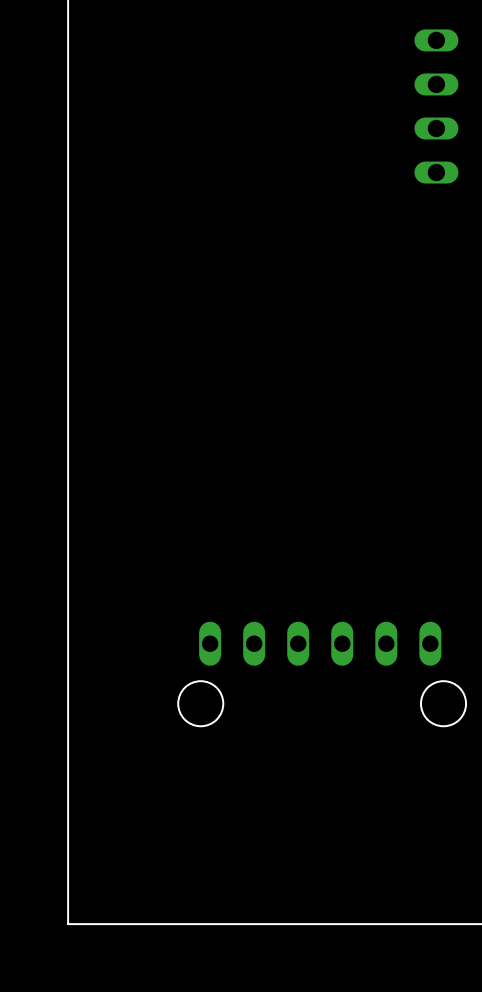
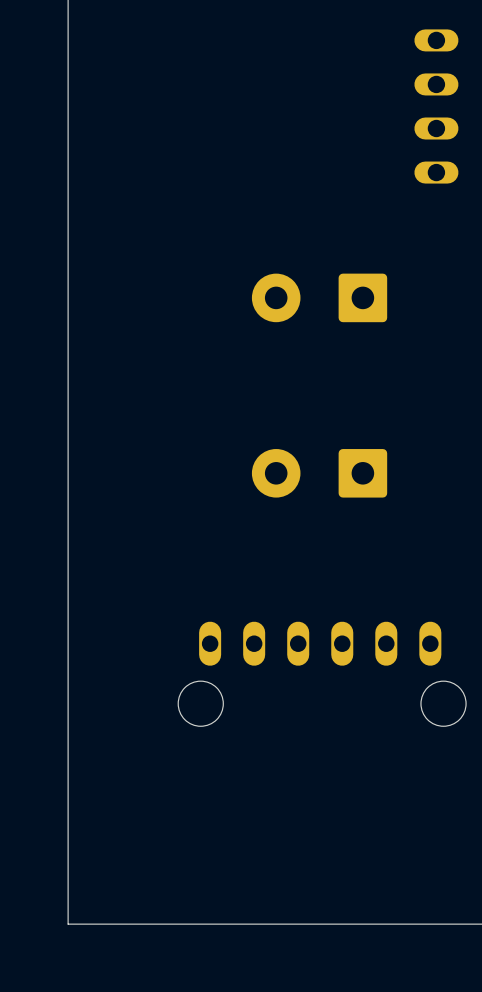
part: none -> (319, 297)
part: none -> (319, 473)

